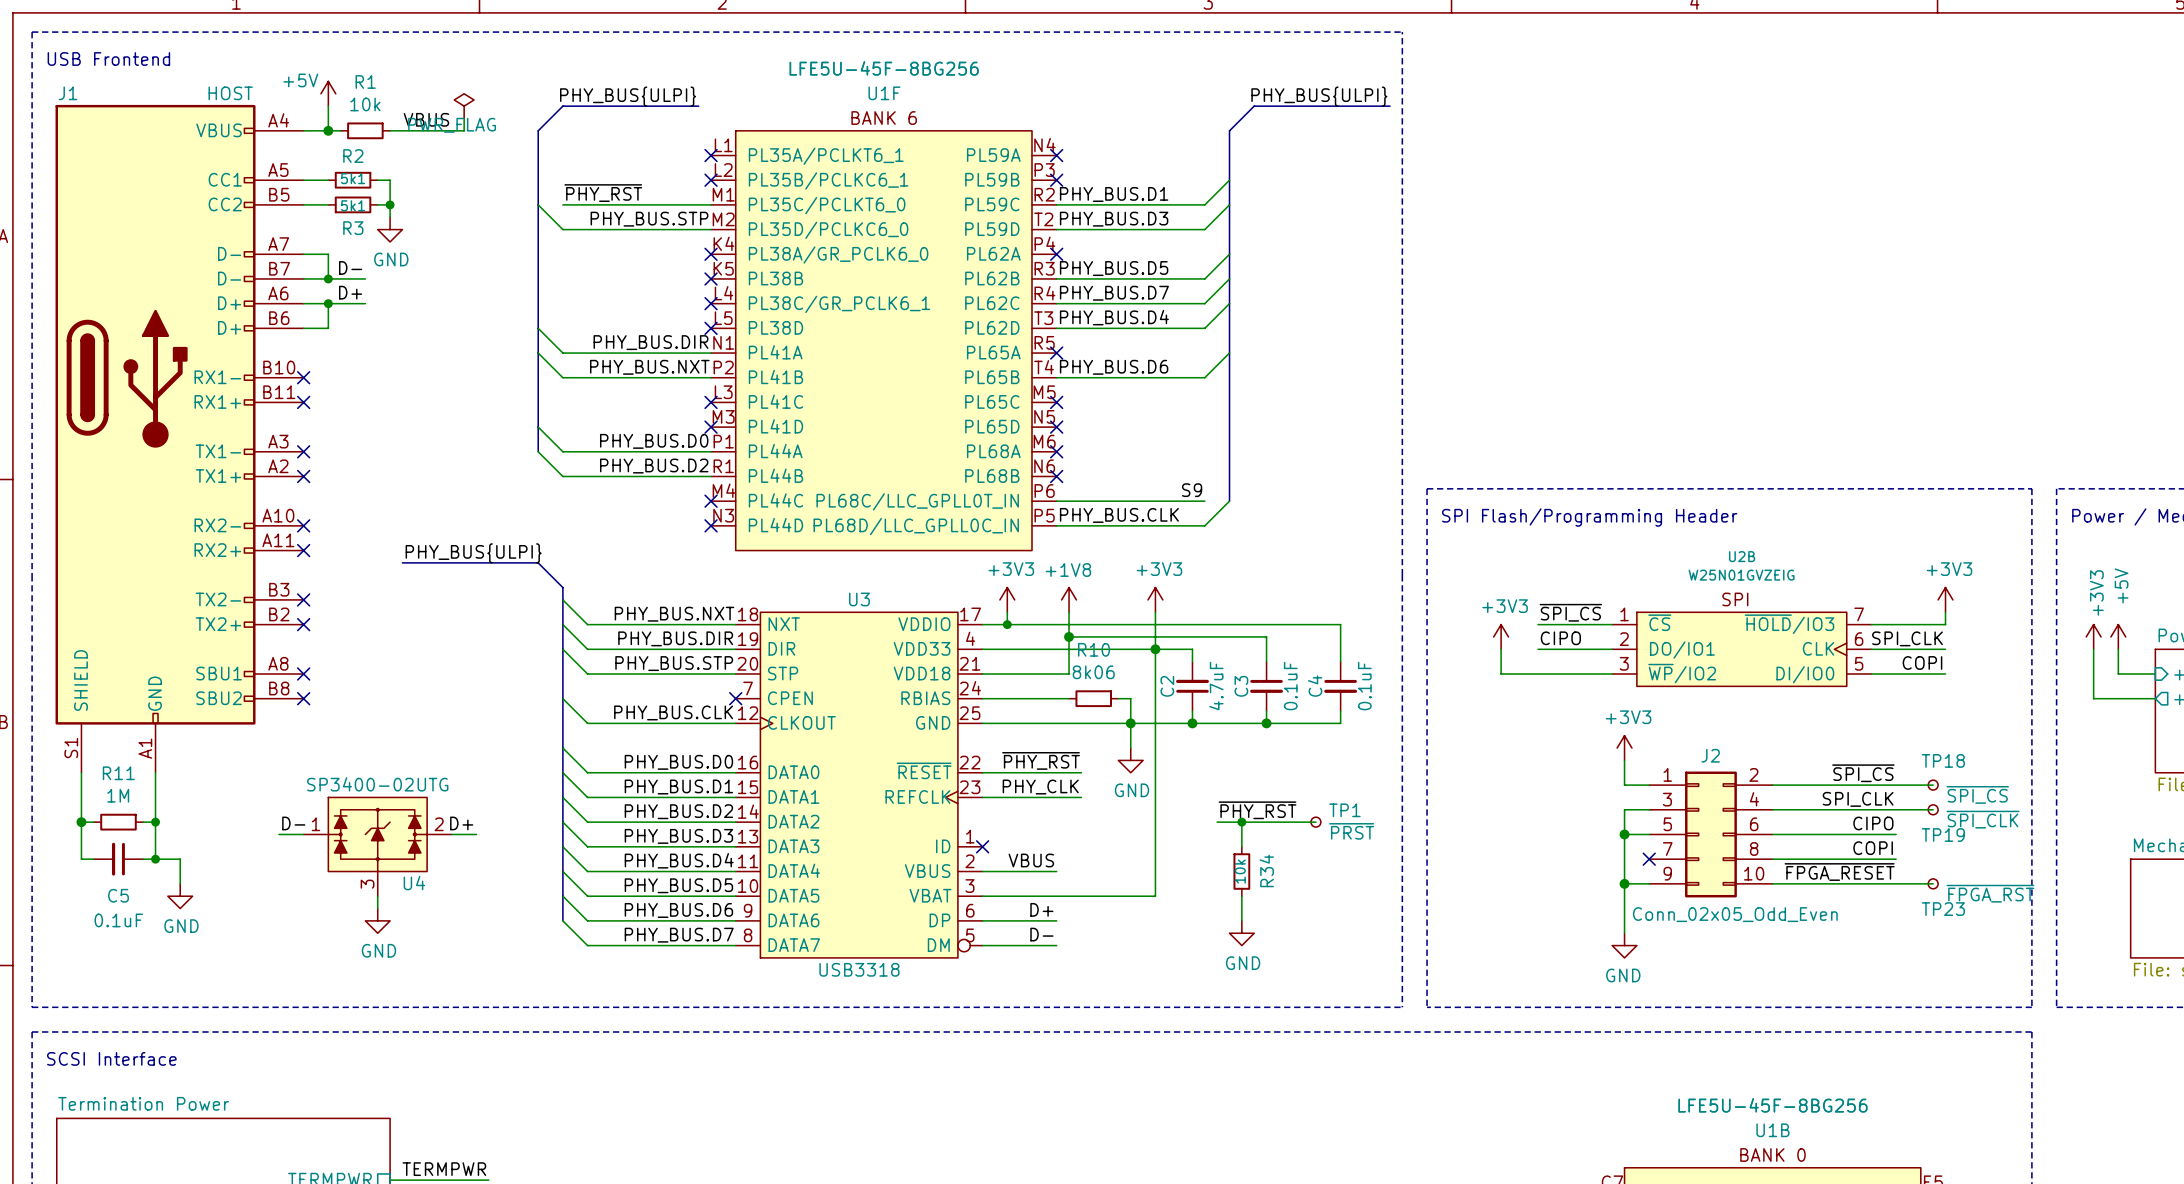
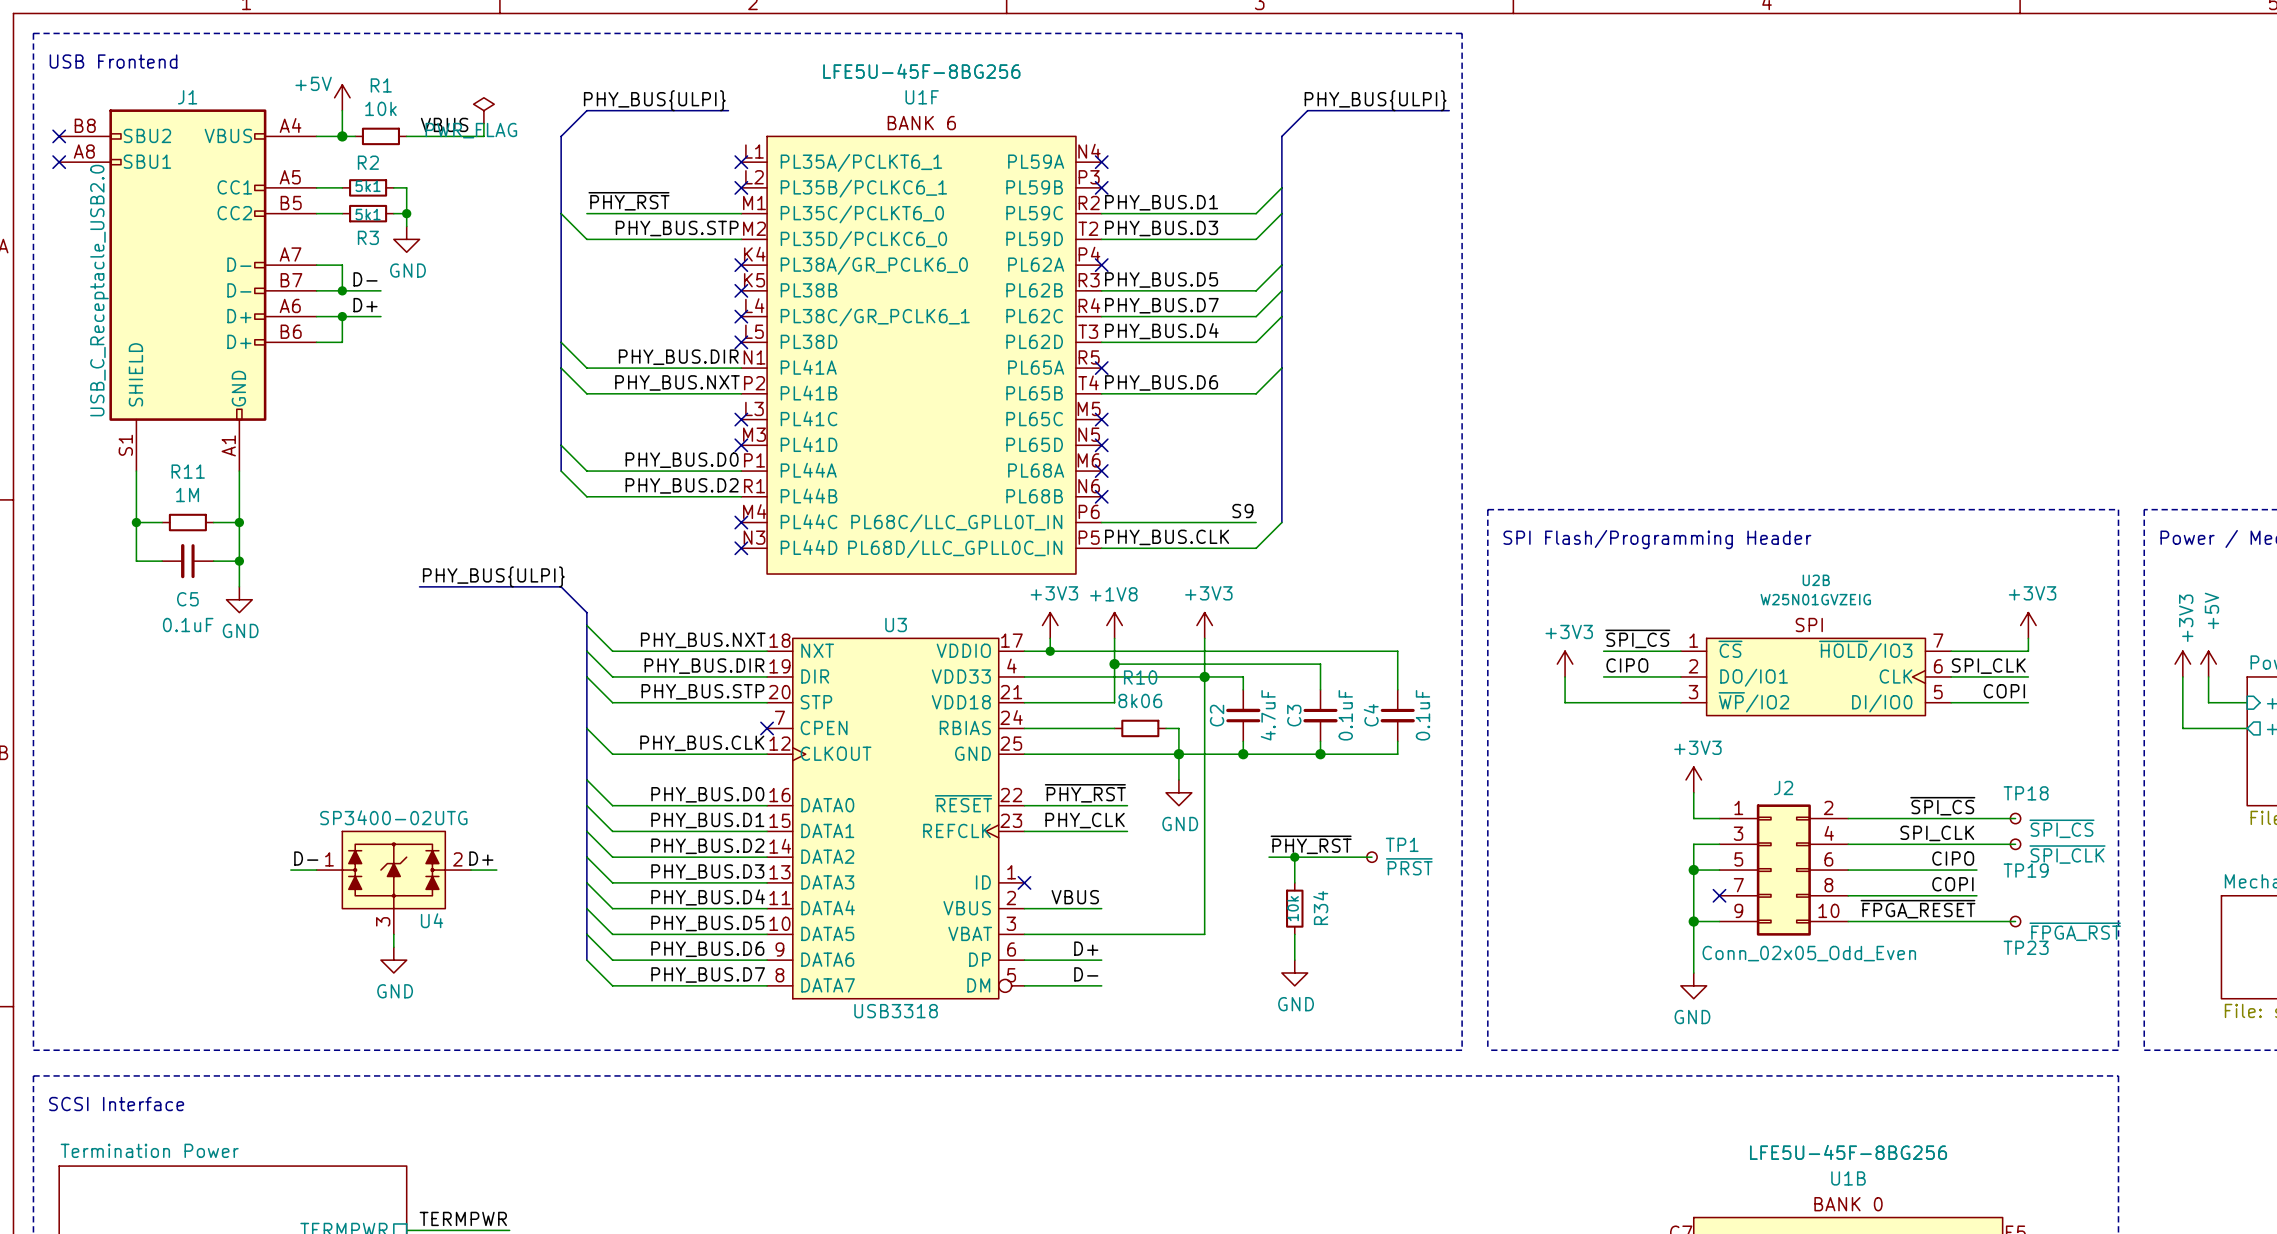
J1 name position: J1 (68, 93) -> J1 (187, 97)
J1 value: HOST (230, 93) -> USB_C_Receptacle_USB2.0 (99, 290)
J1 symbol: [55, 104, 304, 773] -> [59, 109, 317, 472]
no-connect mark: none -> (59, 136)
no-connect mark: none -> (59, 162)
no-connect mark: (303, 377) -> none
no-connect mark: (303, 402) -> none
no-connect mark: (303, 451) -> none
no-connect mark: (303, 476) -> none
junction: none -> (136, 522)
junction: none -> (239, 522)
no-connect mark: (303, 525) -> none
junction: none -> (239, 561)
no-connect mark: (303, 550) -> none
power symbol: none -> GND (239, 599)
no-connect mark: (303, 599) -> none
no-connect mark: (303, 624) -> none
no-connect mark: (303, 674) -> none
no-connect mark: (303, 698) -> none
wire: (81, 772) (81, 859) (93, 859) -> none
wire: (155, 772) (155, 859) -> none
wire: (81, 822) (93, 822) -> none
junction: (81, 822) -> none
R11 position: (118, 822) -> (187, 522)
wire: (143, 822) (155, 822) -> none
junction: (155, 822) -> none
C5 position: (118, 859) -> (187, 561)
wire: (143, 859) (180, 859) (180, 883) -> none
junction: (155, 859) -> none
power symbol: GND (180, 896) -> none

